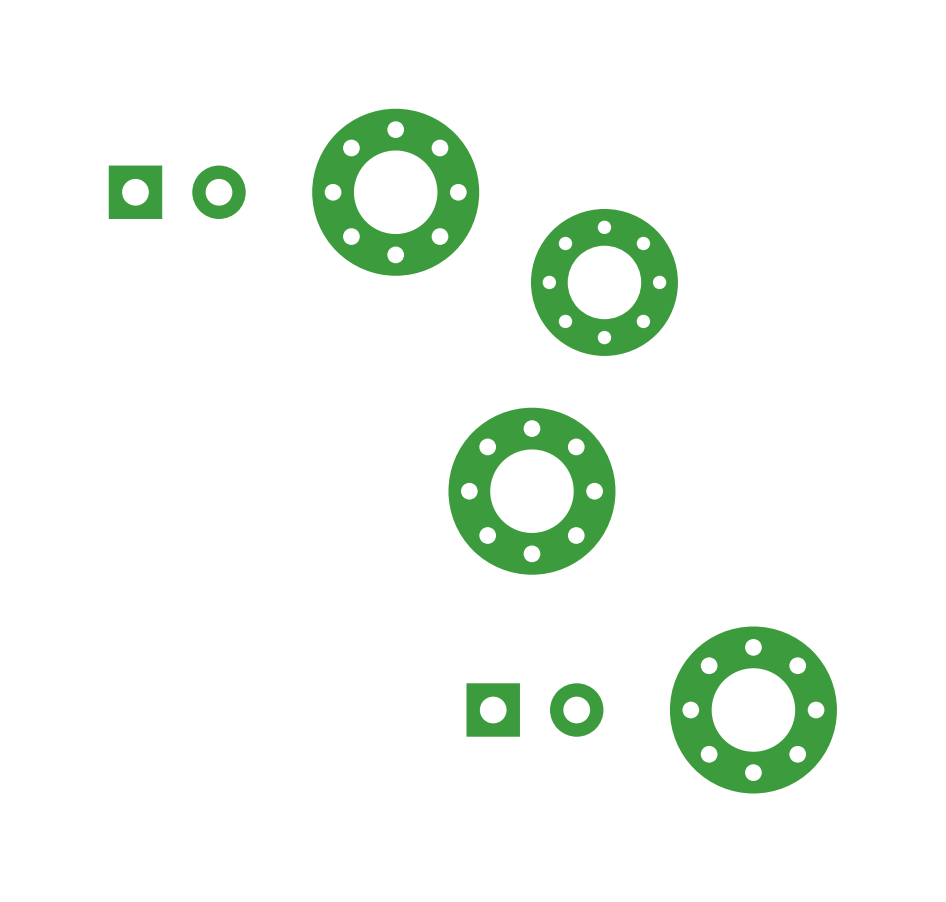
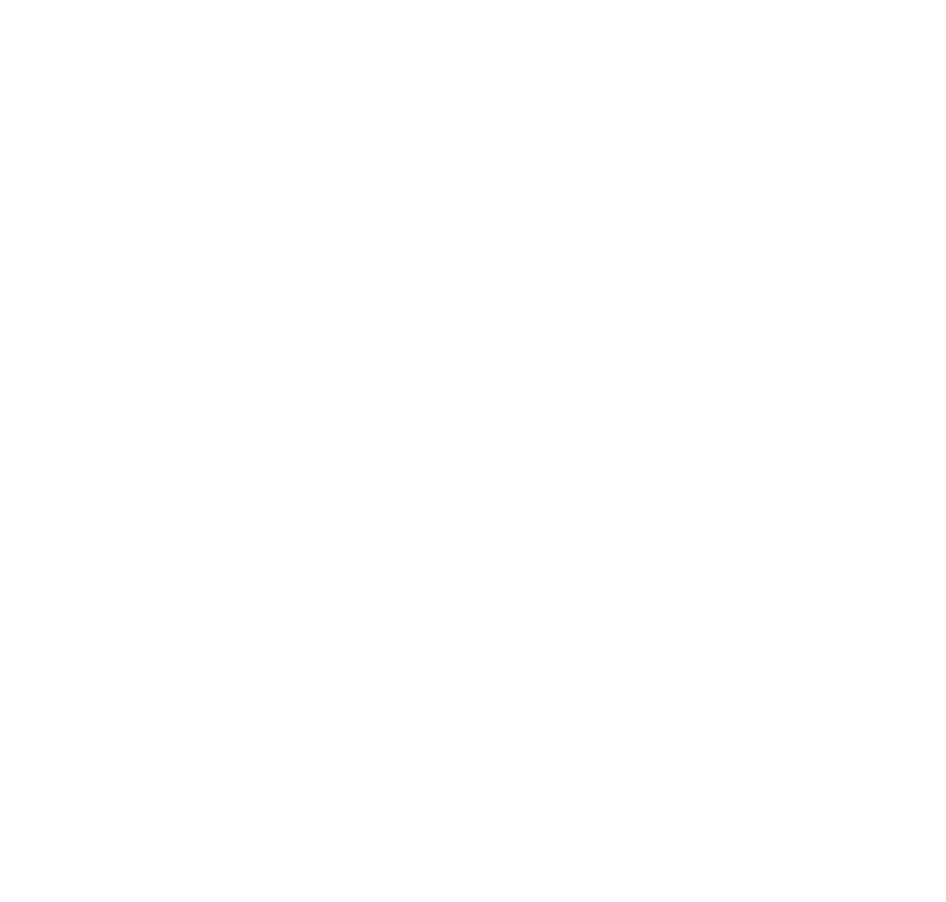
part: (177, 192) -> none
part: (395, 192) -> none
part: (604, 282) -> none
part: (531, 491) -> none
part: (534, 710) -> none
part: (753, 710) -> none

